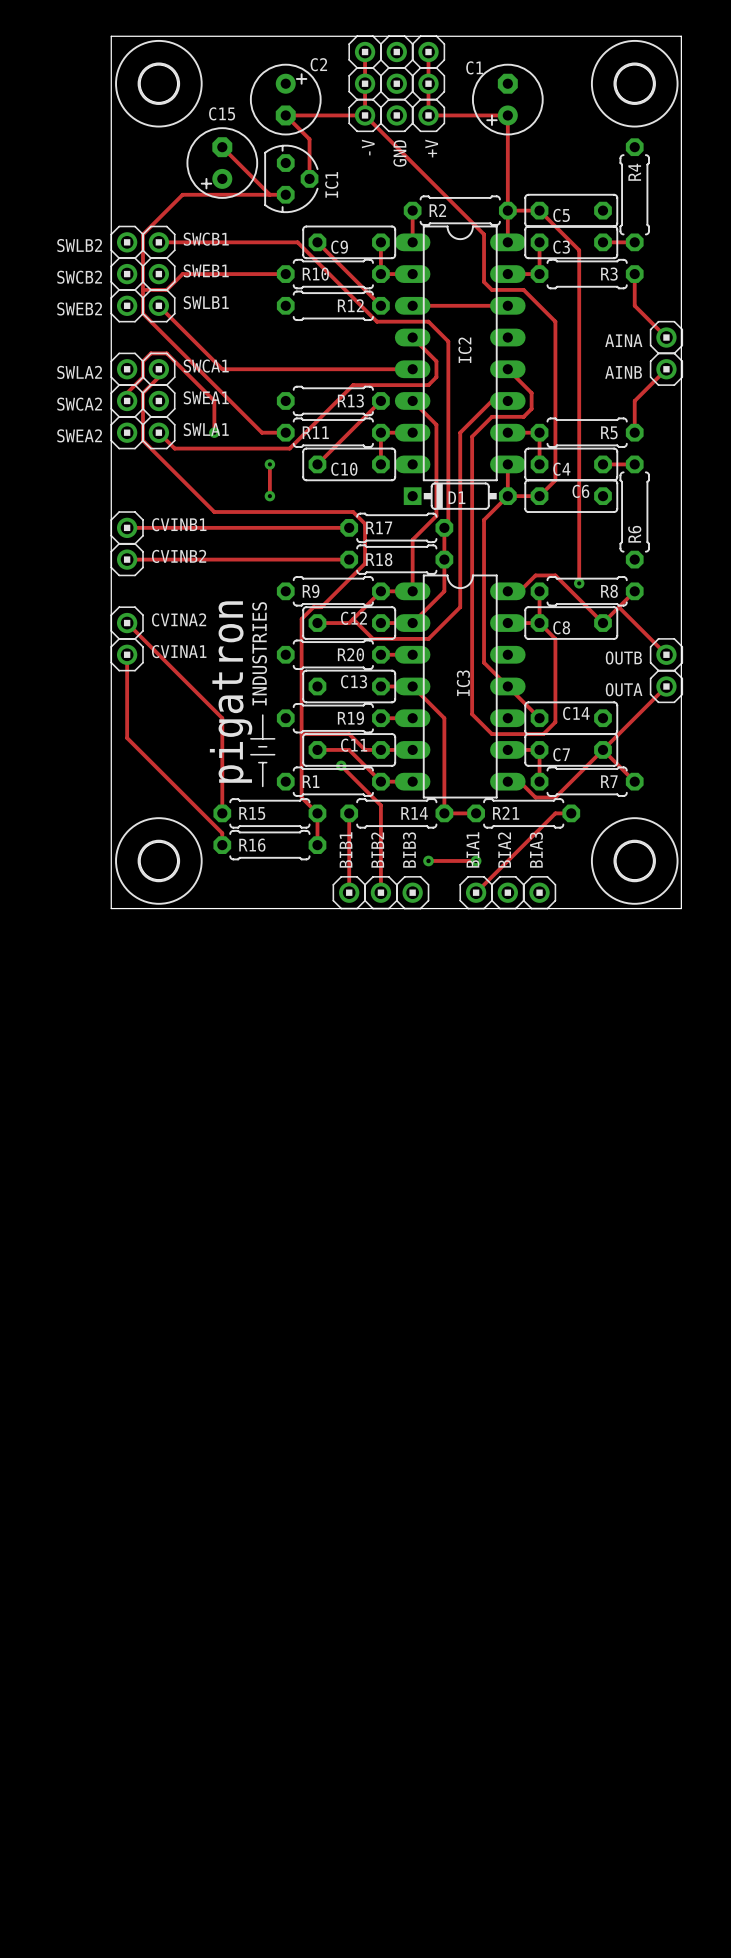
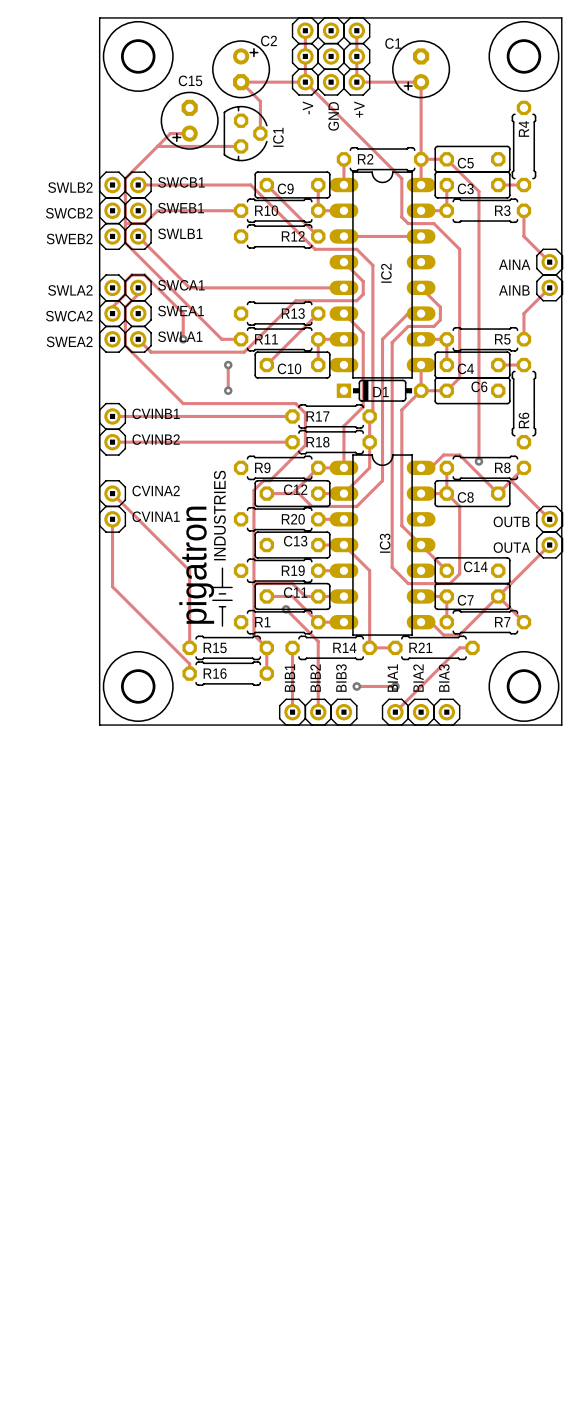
track: (222, 147) (269, 194) -> none
track: none -> (189, 133) (170, 133) (157, 146)

